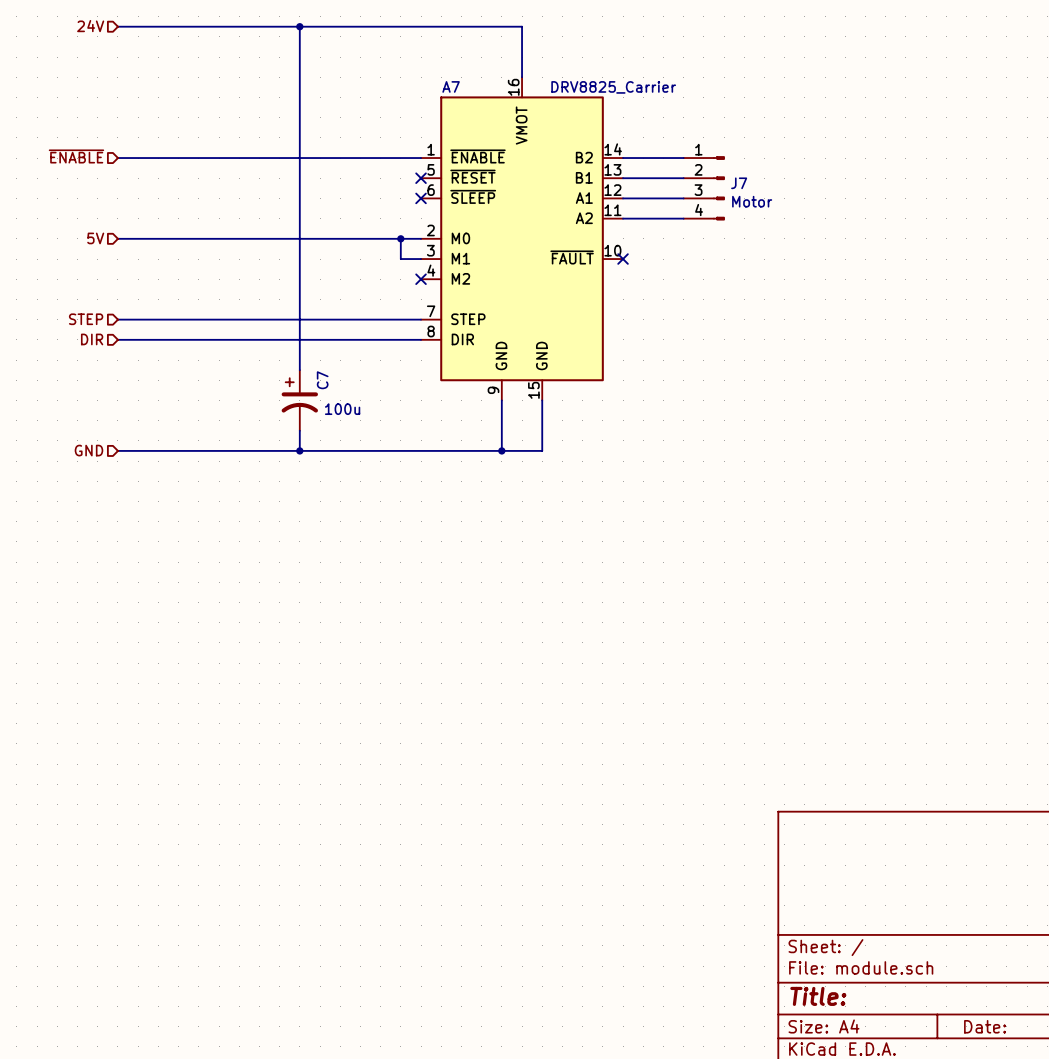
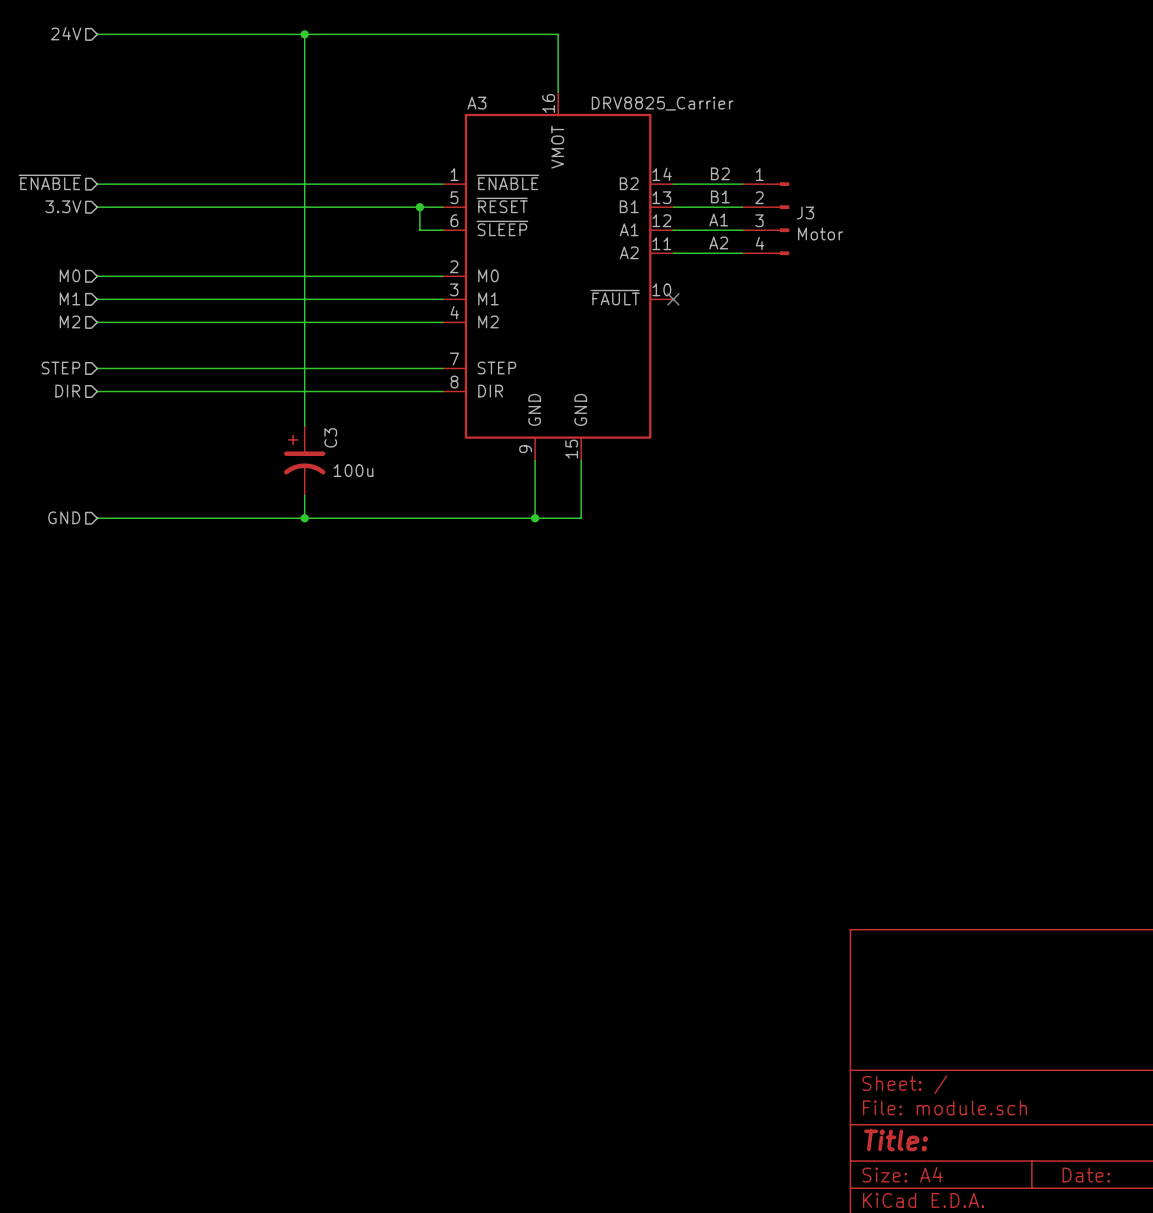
A7 name: A7 (451, 86) -> A3 (476, 103)
label: none -> B2 (720, 173)
label: none -> B1 (720, 196)
hierarchical label: none -> 3.3V (63, 206)
wire: none -> (97, 207) (442, 207)
wire: none -> (419, 207) (419, 230) (442, 230)
junction: none -> (419, 207)
no-connect mark: (421, 178) -> none
J7 name: J7 (739, 183) -> J3 (805, 212)
label: none -> A1 (718, 219)
no-connect mark: (421, 198) -> none
label: none -> A2 (718, 242)
hierarchical label: 5V (95, 238) -> M0 (69, 275)
wire: (400, 238) (400, 259) -> (97, 299) (419, 299)
junction: (400, 238) -> none
hierarchical label: none -> M1 (69, 298)
hierarchical label: none -> M2 (69, 321)
wire: none -> (97, 322) (442, 322)
no-connect mark: (421, 279) -> none
C7 name: C7 (322, 380) -> C3 (330, 437)

